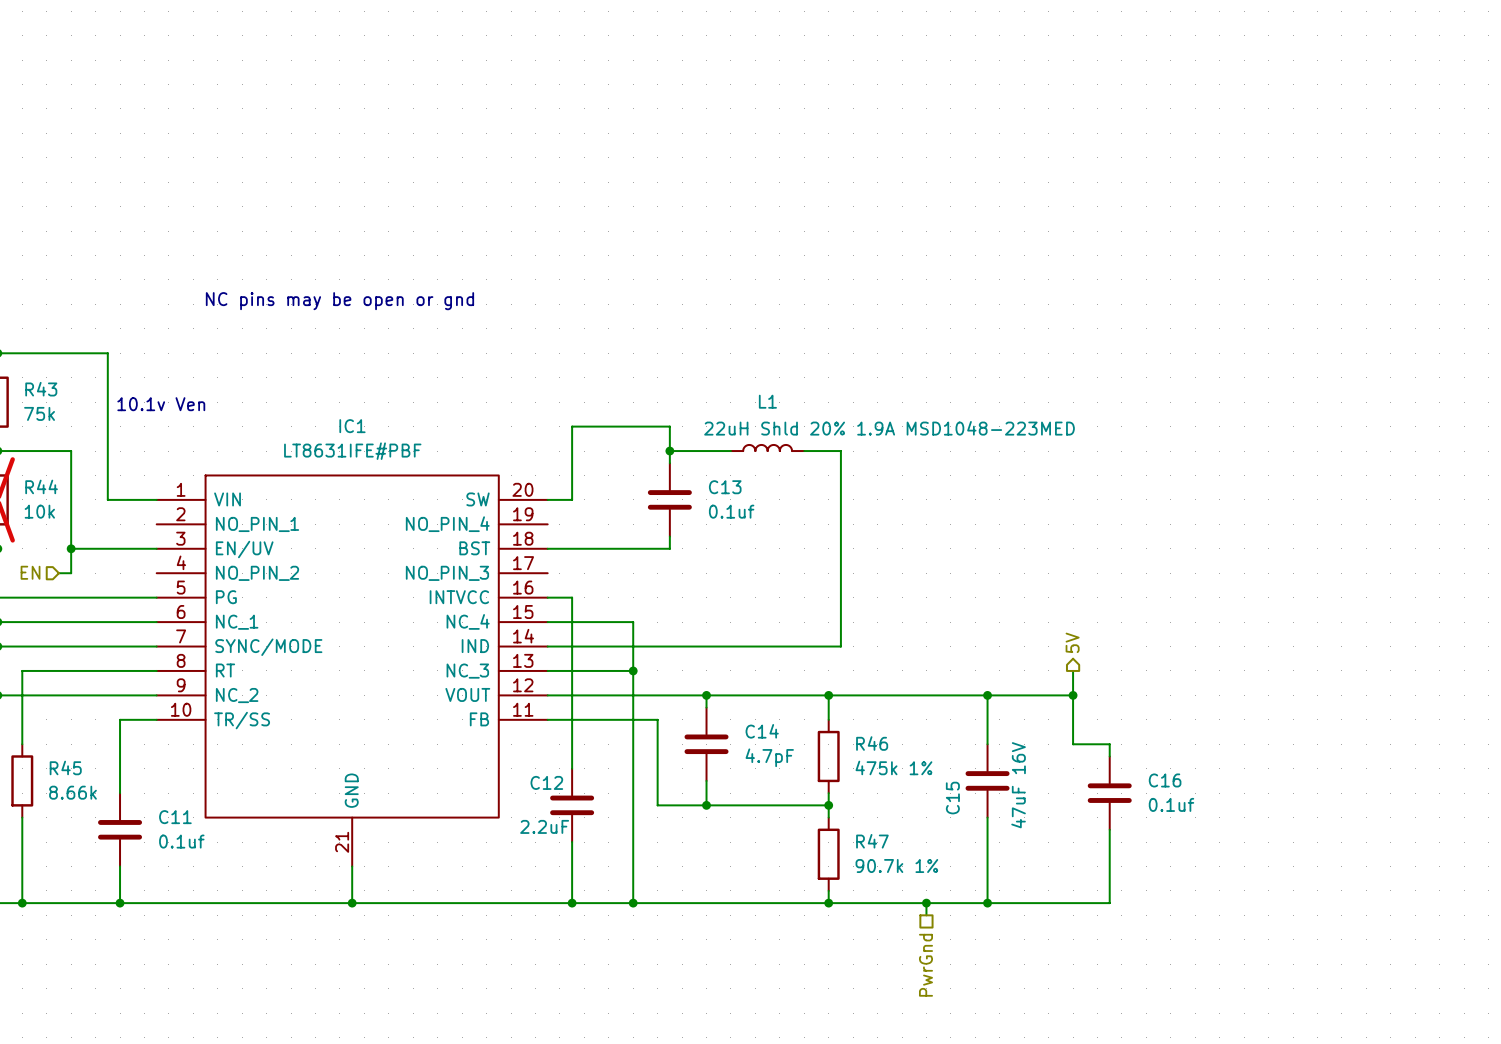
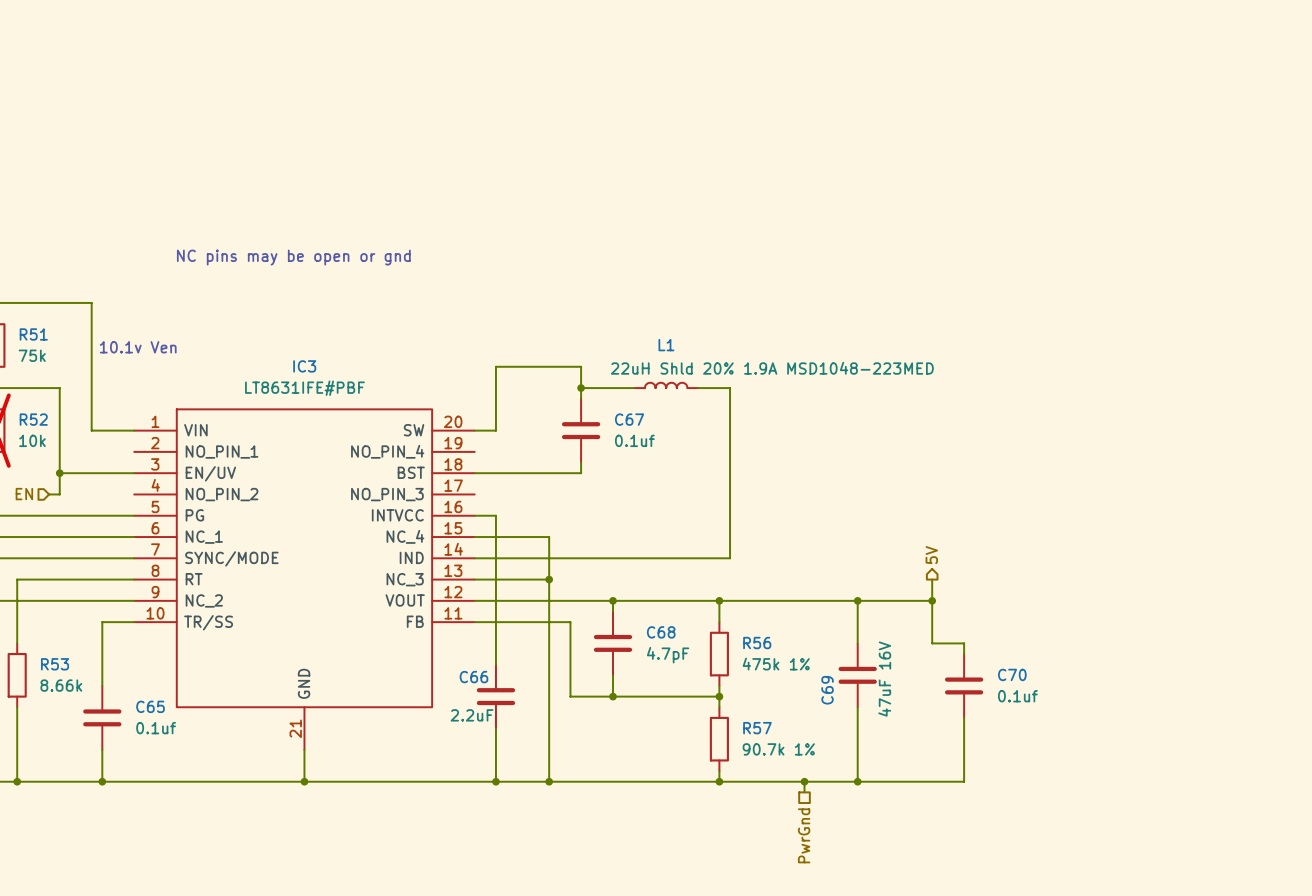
R43 name: R43 (41, 389) -> R51 (33, 334)
IC1 name: IC1 (352, 426) -> IC3 (304, 366)
R44 name: R44 (41, 486) -> R52 (33, 419)
C13 name: C13 (725, 487) -> C67 (629, 419)
C14 name: C14 (762, 731) -> C68 (661, 632)
R46 name: R46 (872, 743) -> R56 (757, 643)
R45 name: R45 (65, 767) -> R53 (55, 664)
C16 name: C16 (1165, 780) -> C70 (1012, 674)
C12 name: C12 (546, 782) -> C66 (473, 677)
C15 name: C15 (952, 798) -> C69 (827, 690)
C11 name: C11 (175, 817) -> C65 (150, 706)
R47 name: R47 (872, 841) -> R57 (757, 728)

